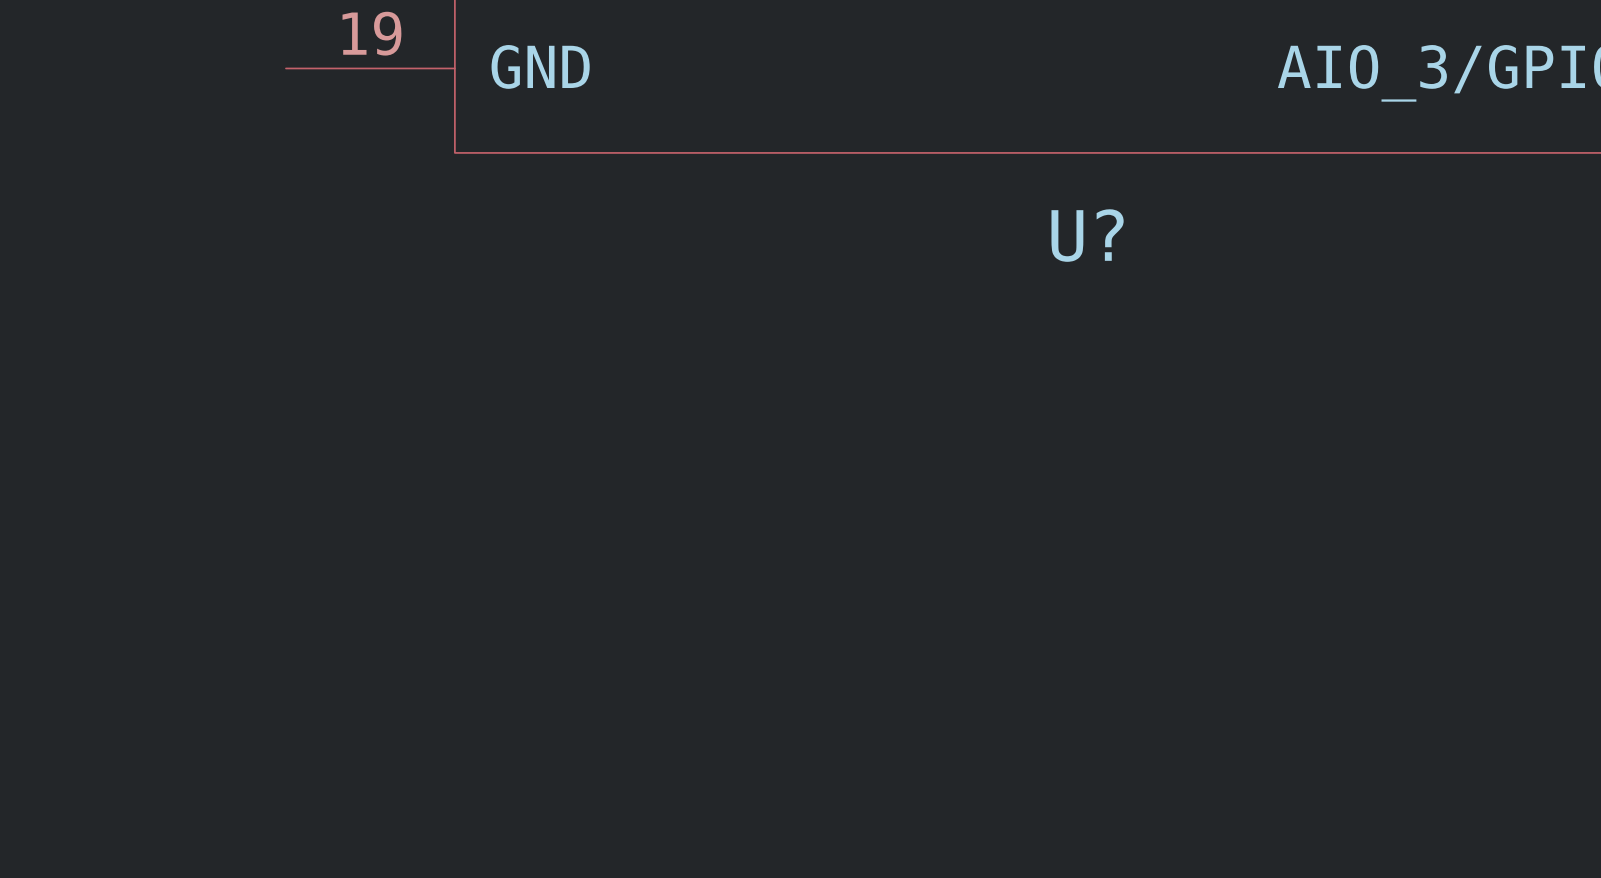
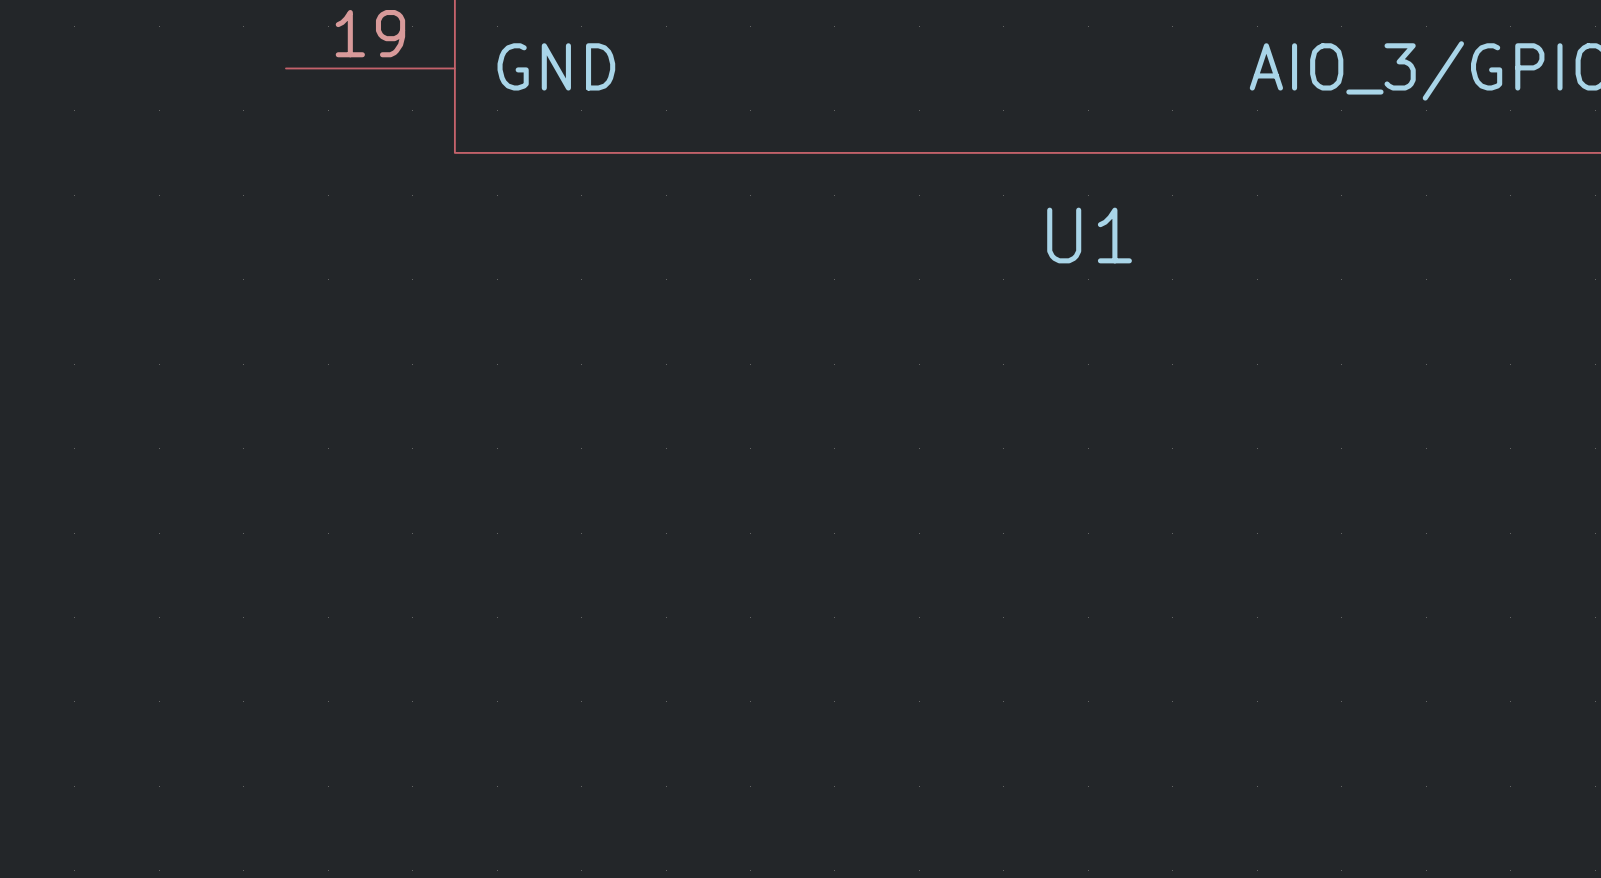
U? name: U? (1087, 235) -> U1 (1089, 235)

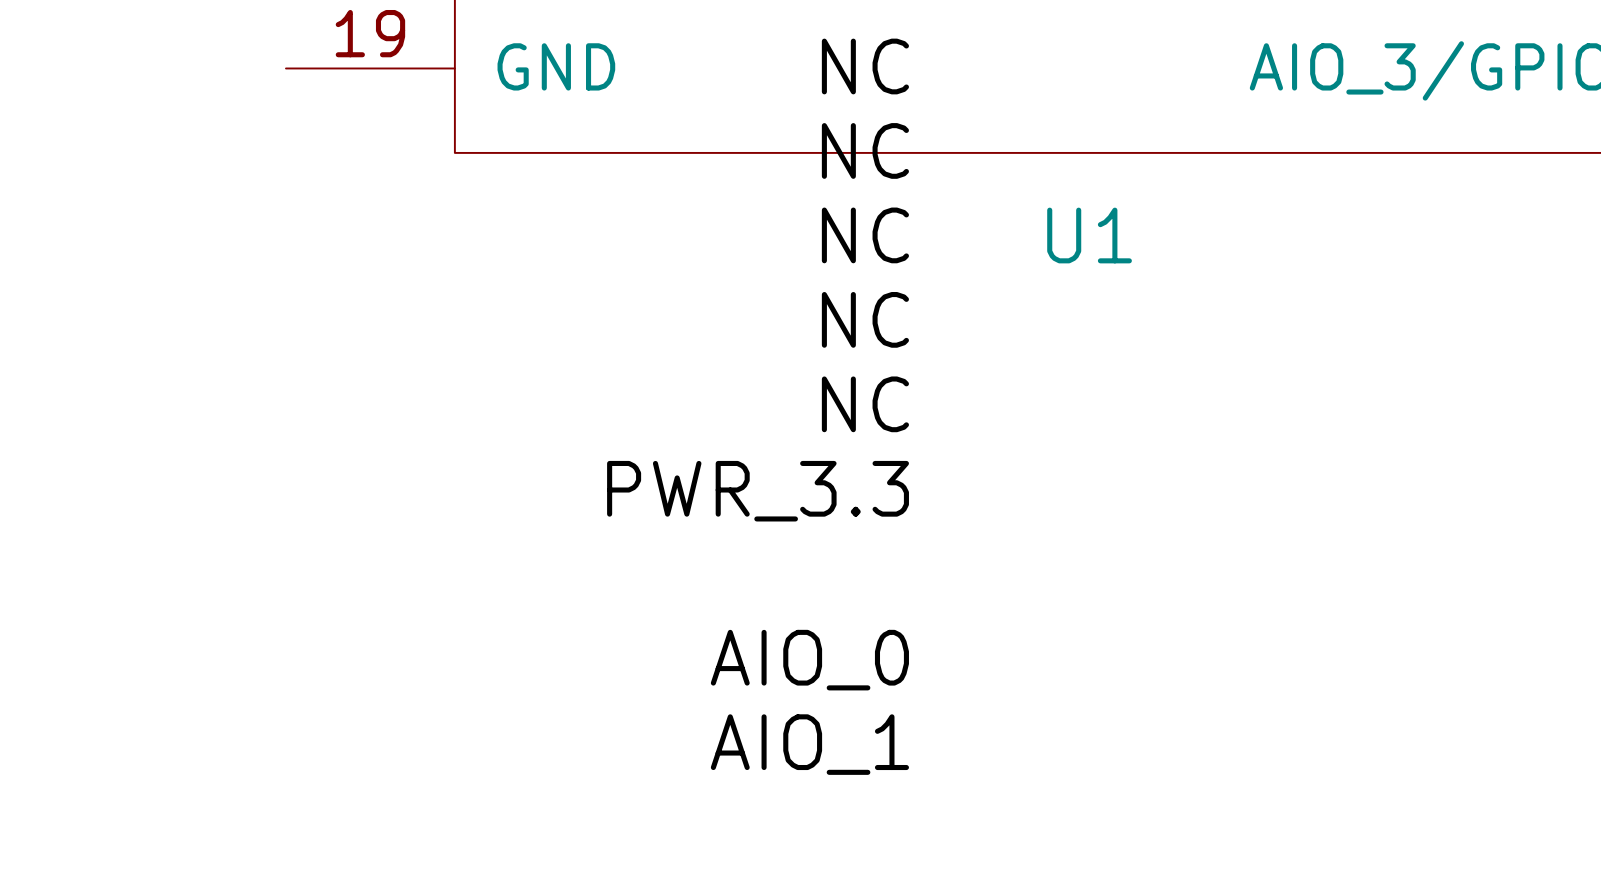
label: none -> NC (865, 66)
label: none -> NC (865, 150)
label: none -> NC (865, 235)
label: none -> NC (865, 319)
label: none -> NC (865, 404)
label: none -> PWR_3.3 (758, 491)
label: none -> AIO_0 (809, 660)
label: none -> AIO_1 (809, 744)

